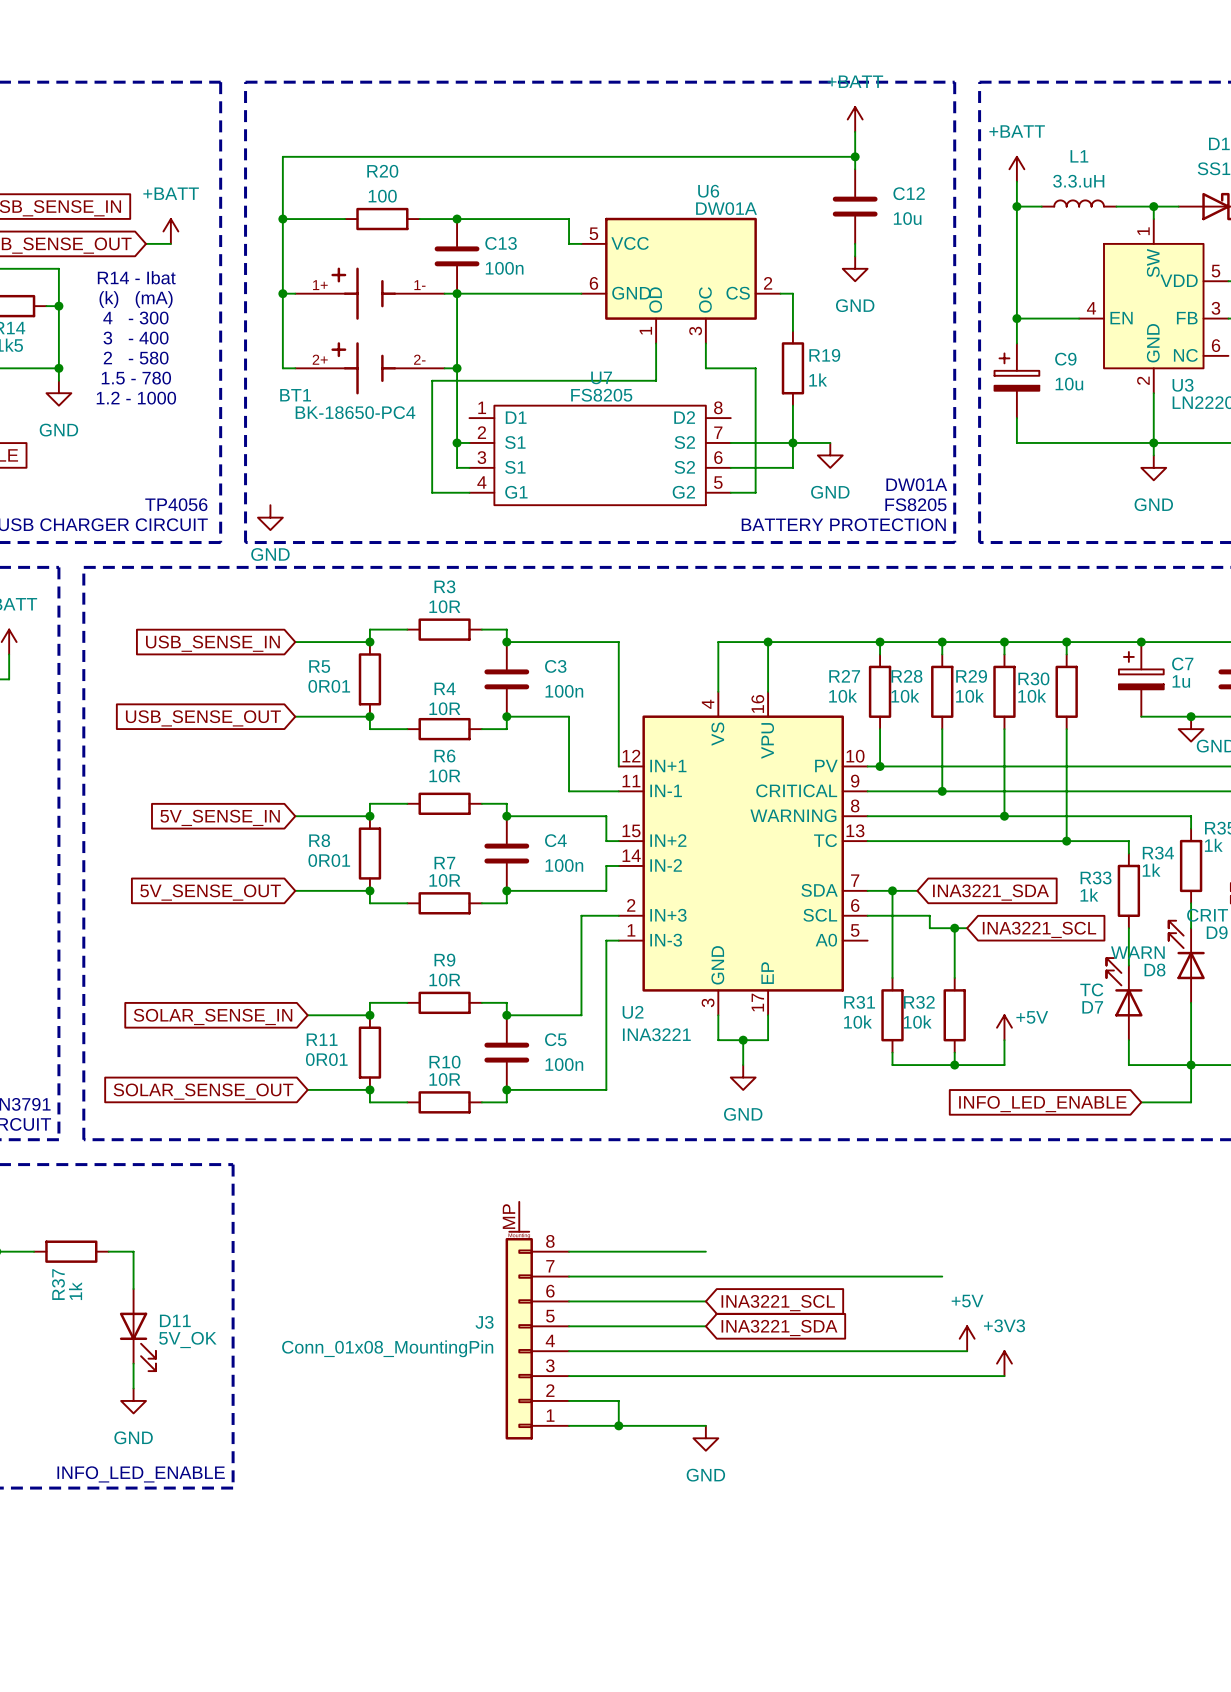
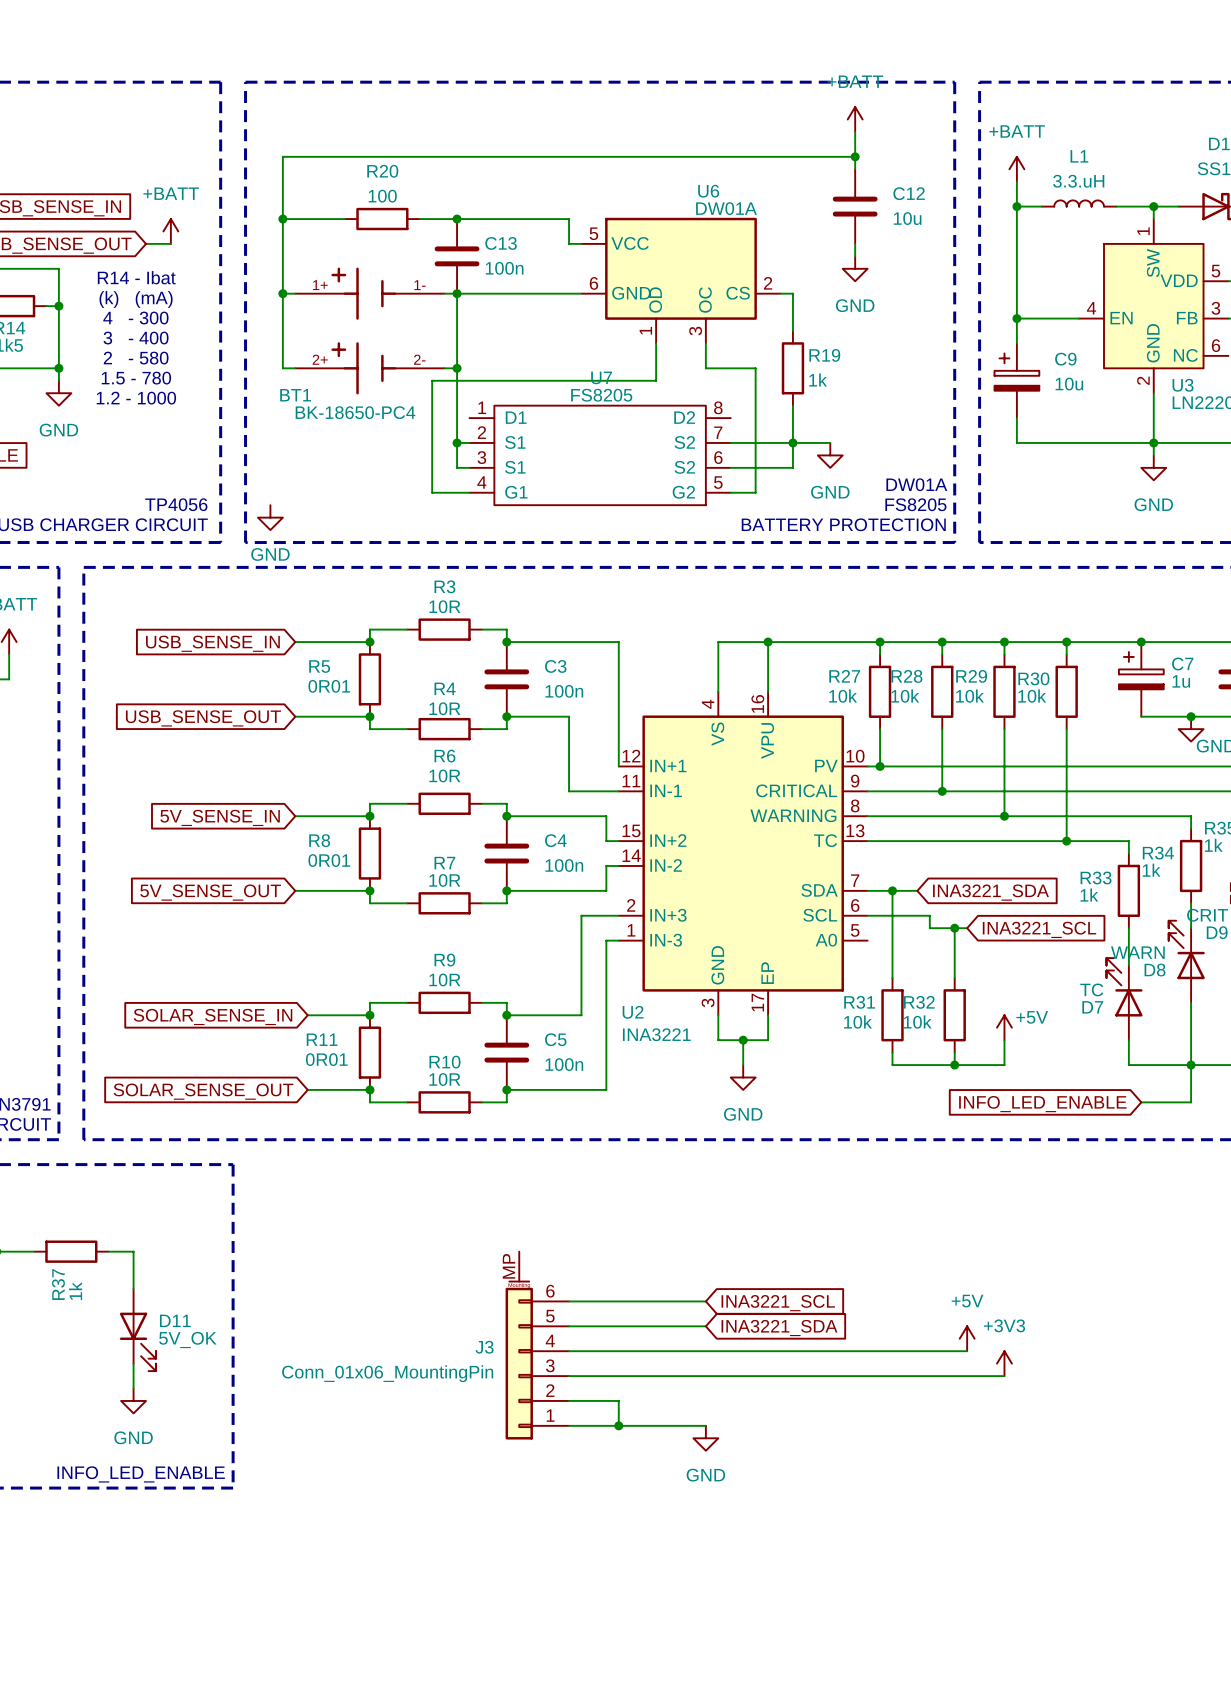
J3 symbol: [505, 1201, 570, 1440] -> [505, 1251, 570, 1440]
wire: (569, 1251) (705, 1251) -> none
wire: (569, 1276) (942, 1276) -> none
J3 value: Conn_01x08_MountingPin (387, 1348) -> Conn_01x06_MountingPin (387, 1373)

